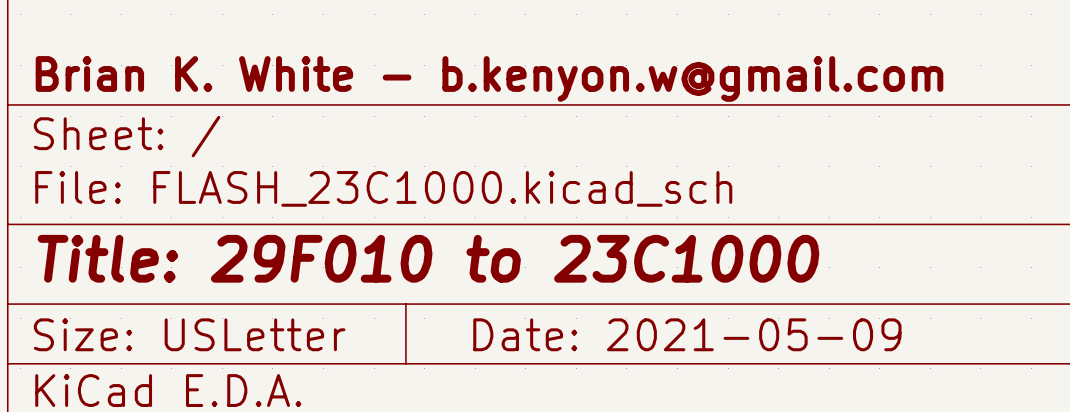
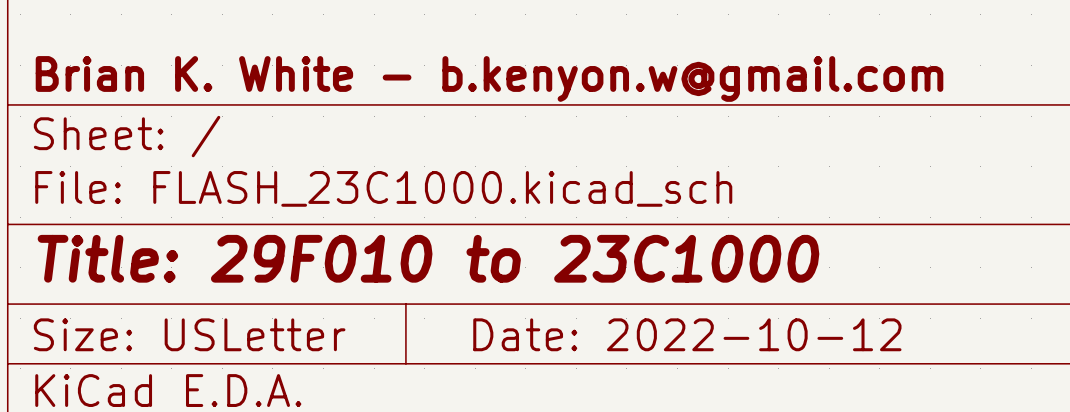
title block: Date: 2021-05-09 (687, 334) -> Date: 2022-10-12 (687, 334)

